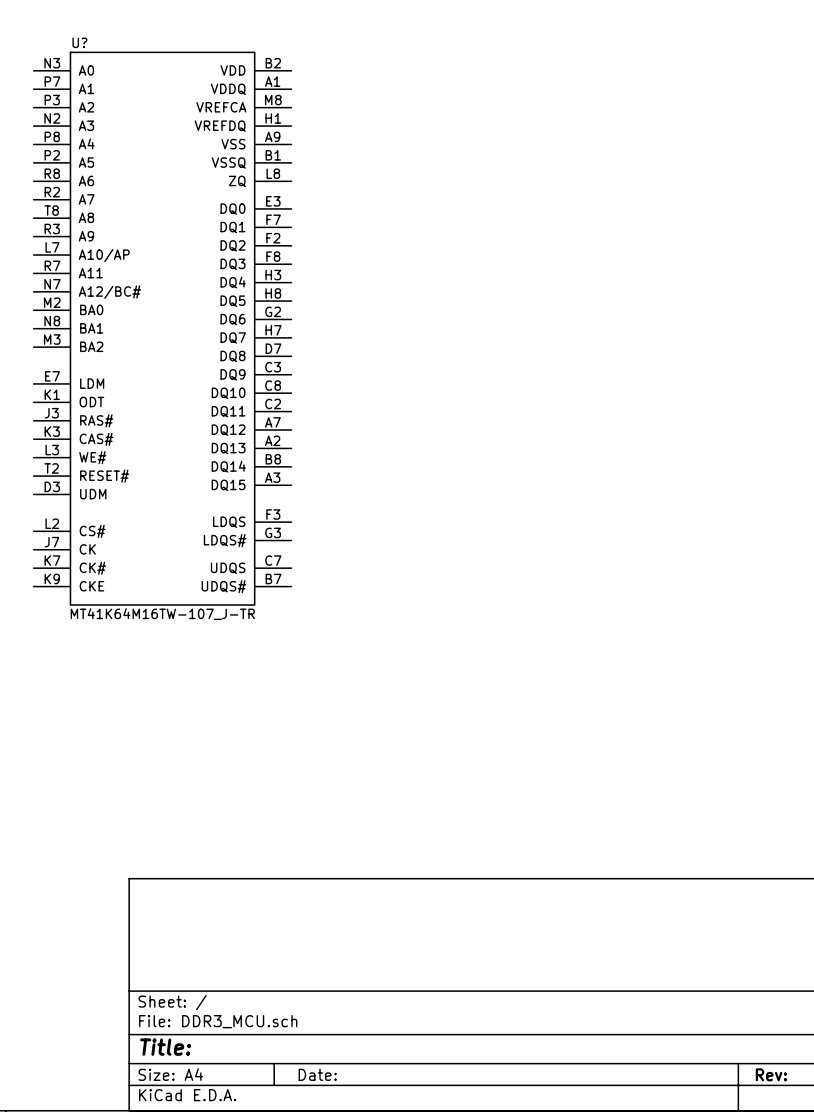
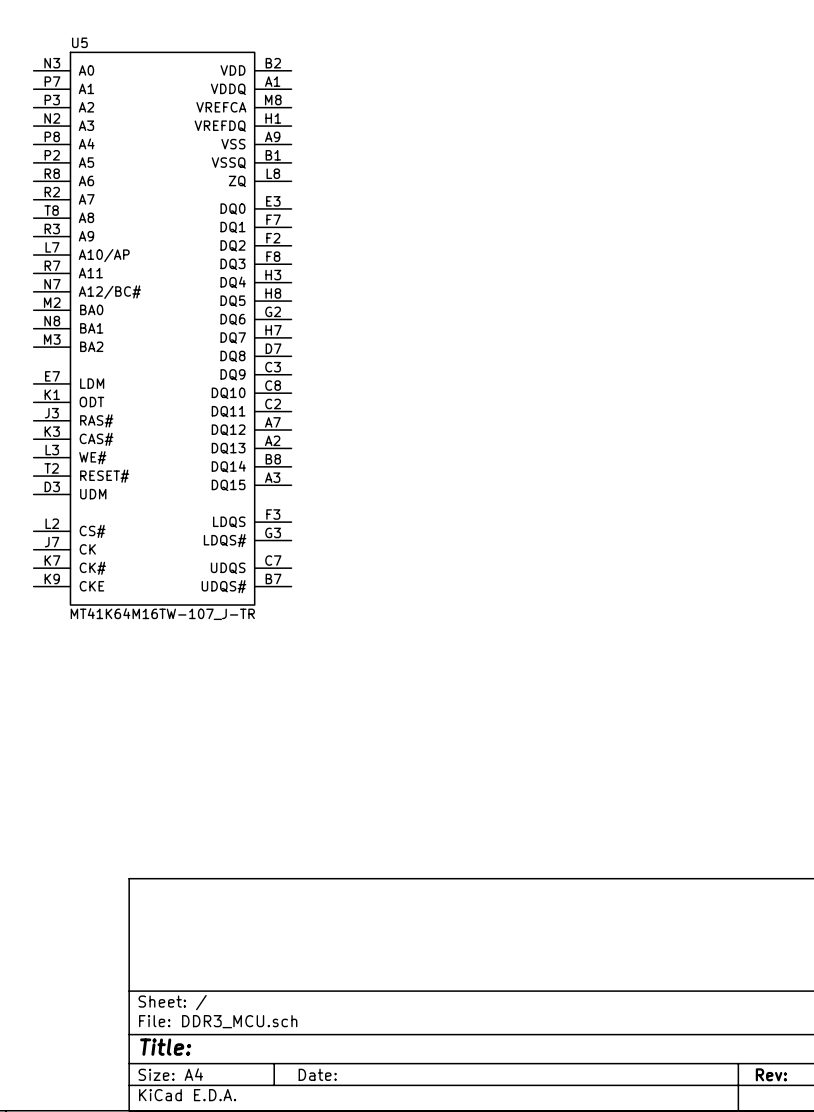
U? name: U? (79, 42) -> U5 (79, 42)

